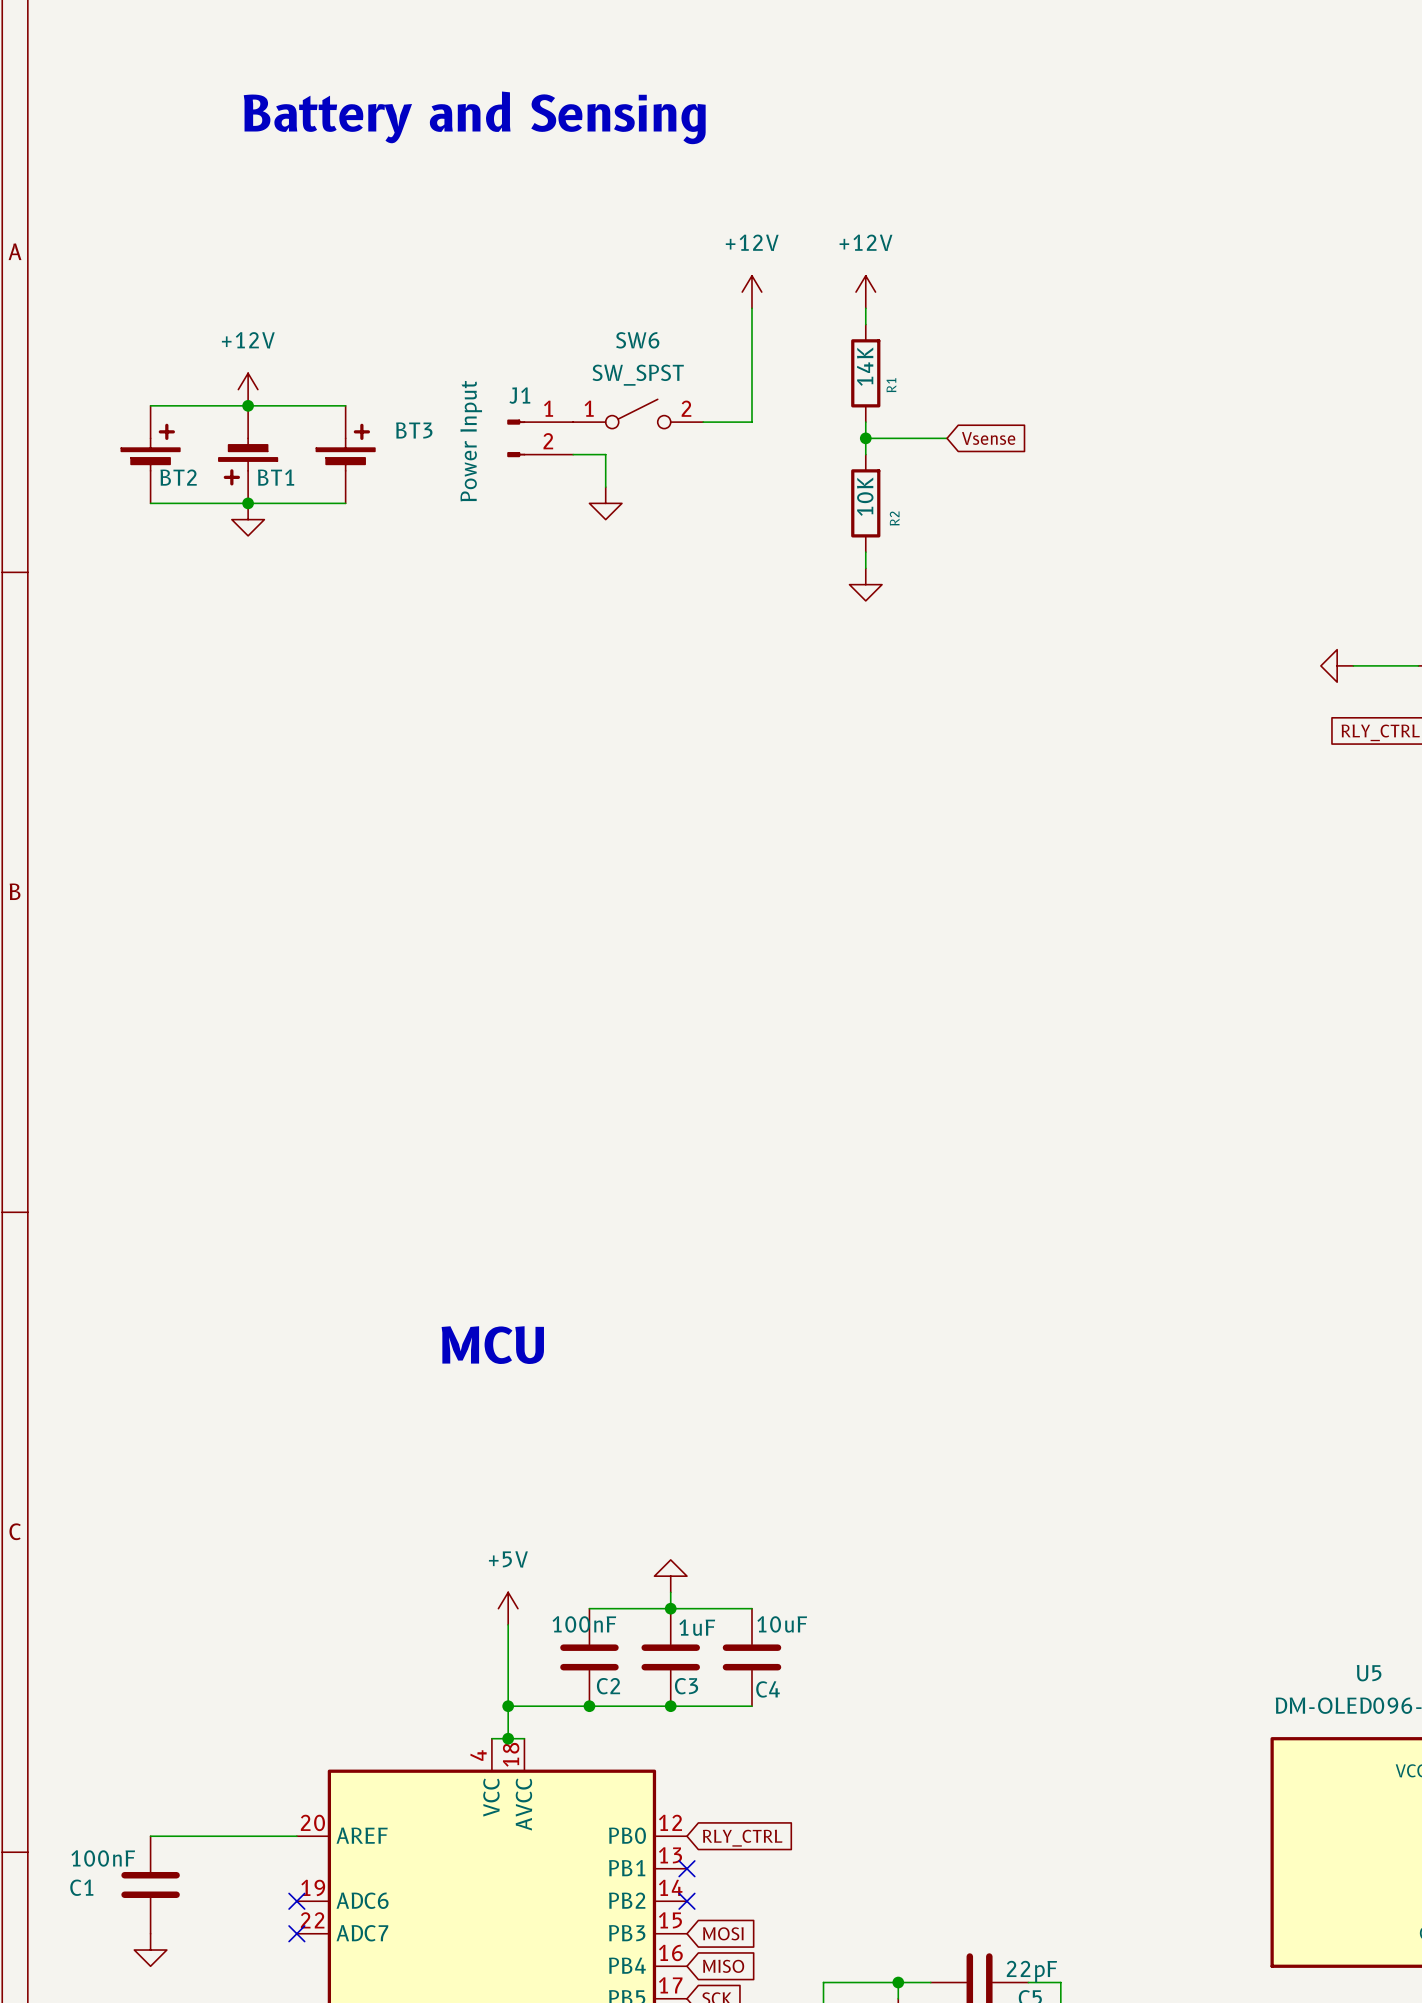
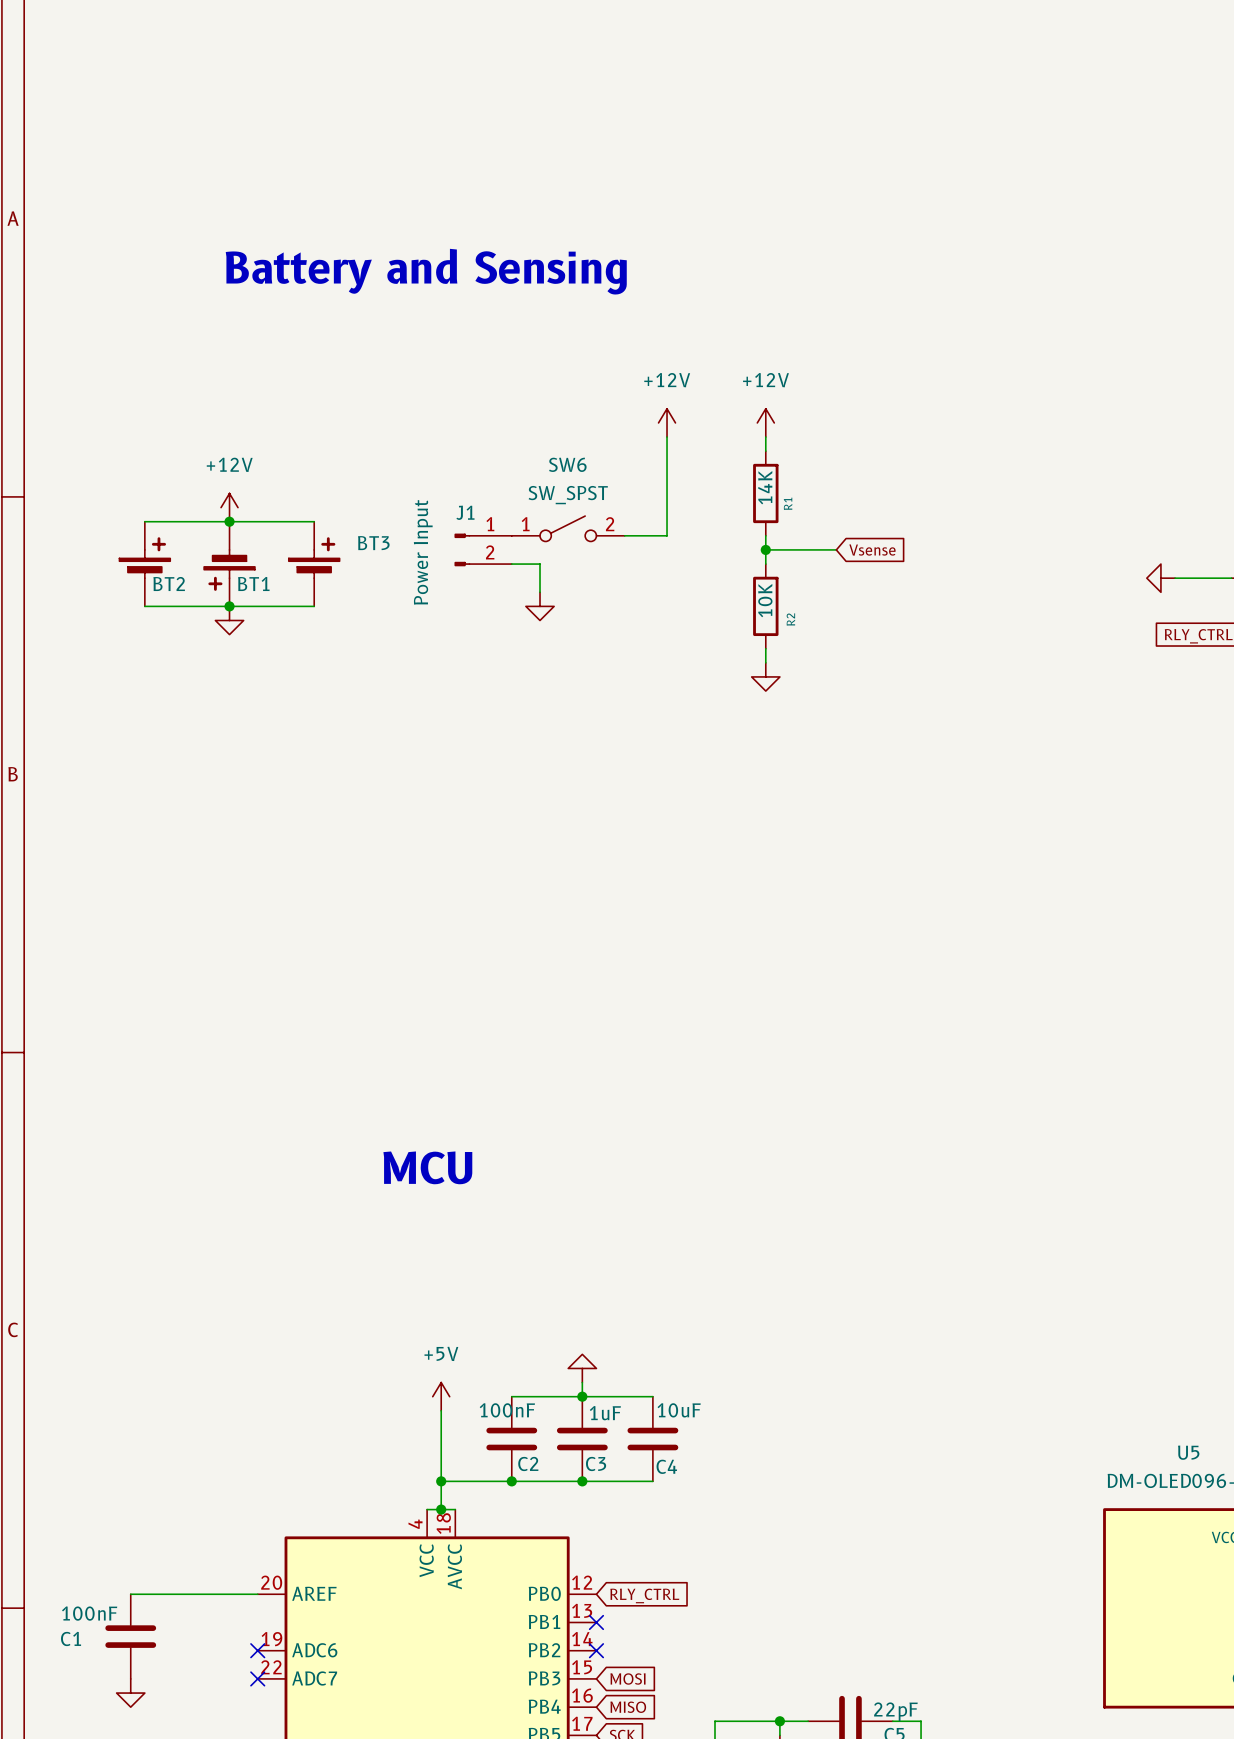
text position: Battery and Sensing (474, 117) -> Battery and Sensing (426, 271)
power symbol: +12V (751, 292) -> none
power symbol: +12V (865, 292) -> none
wire: (751, 308) (751, 422) (703, 422) -> (667, 437) (667, 535) (624, 535)
wire: (865, 308) (865, 324) -> (765, 437) (765, 451)
R1 position: (865, 373) -> (765, 493)
power symbol position: +12V (248, 389) -> +12V (229, 507)
wire: (150, 405) (345, 405) -> (144, 521) (314, 521)
junction: (248, 405) -> none
SW6 position: (638, 413) -> (568, 528)
wire: (865, 422) (865, 454) -> (765, 535) (765, 564)
J1 position: (540, 438) -> (483, 549)
wire: (865, 438) (947, 438) -> (765, 549) (836, 549)
junction: (865, 438) -> none
global label position: Vsense (988, 438) -> Vsense (872, 550)
BT1 position: (150, 454) -> (144, 564)
BT2 position: (248, 454) -> (229, 564)
BT3 position: (345, 454) -> (314, 564)
wire: (573, 454) (605, 454) (605, 487) -> (511, 564) (540, 564) (540, 592)
power symbol: none -> +12V (667, 422)
power symbol: none -> +12V (765, 422)
wire: (150, 503) (345, 503) -> (144, 606) (314, 606)
junction: (248, 503) -> none
power symbol: (605, 503) -> none
R2 position: (865, 503) -> (765, 606)
power symbol position: (248, 519) -> (229, 620)
wire: (865, 552) (865, 568) -> (765, 648) (765, 662)
power symbol: (865, 584) -> none
junction: none -> (229, 521)
junction: none -> (765, 549)
junction: none -> (229, 606)
power symbol: none -> (540, 606)
power symbol: none -> (765, 676)

